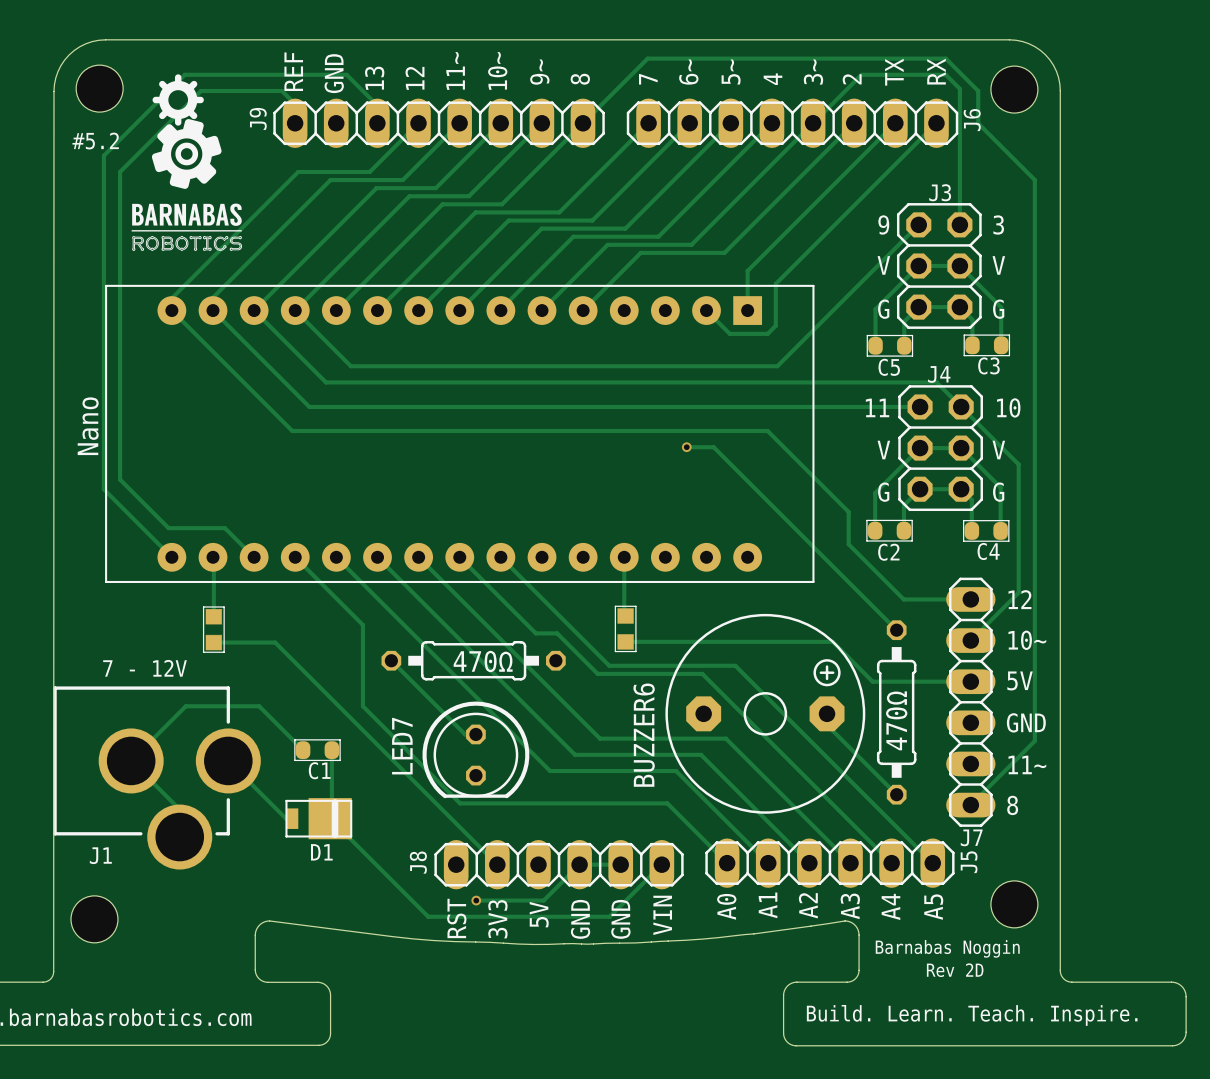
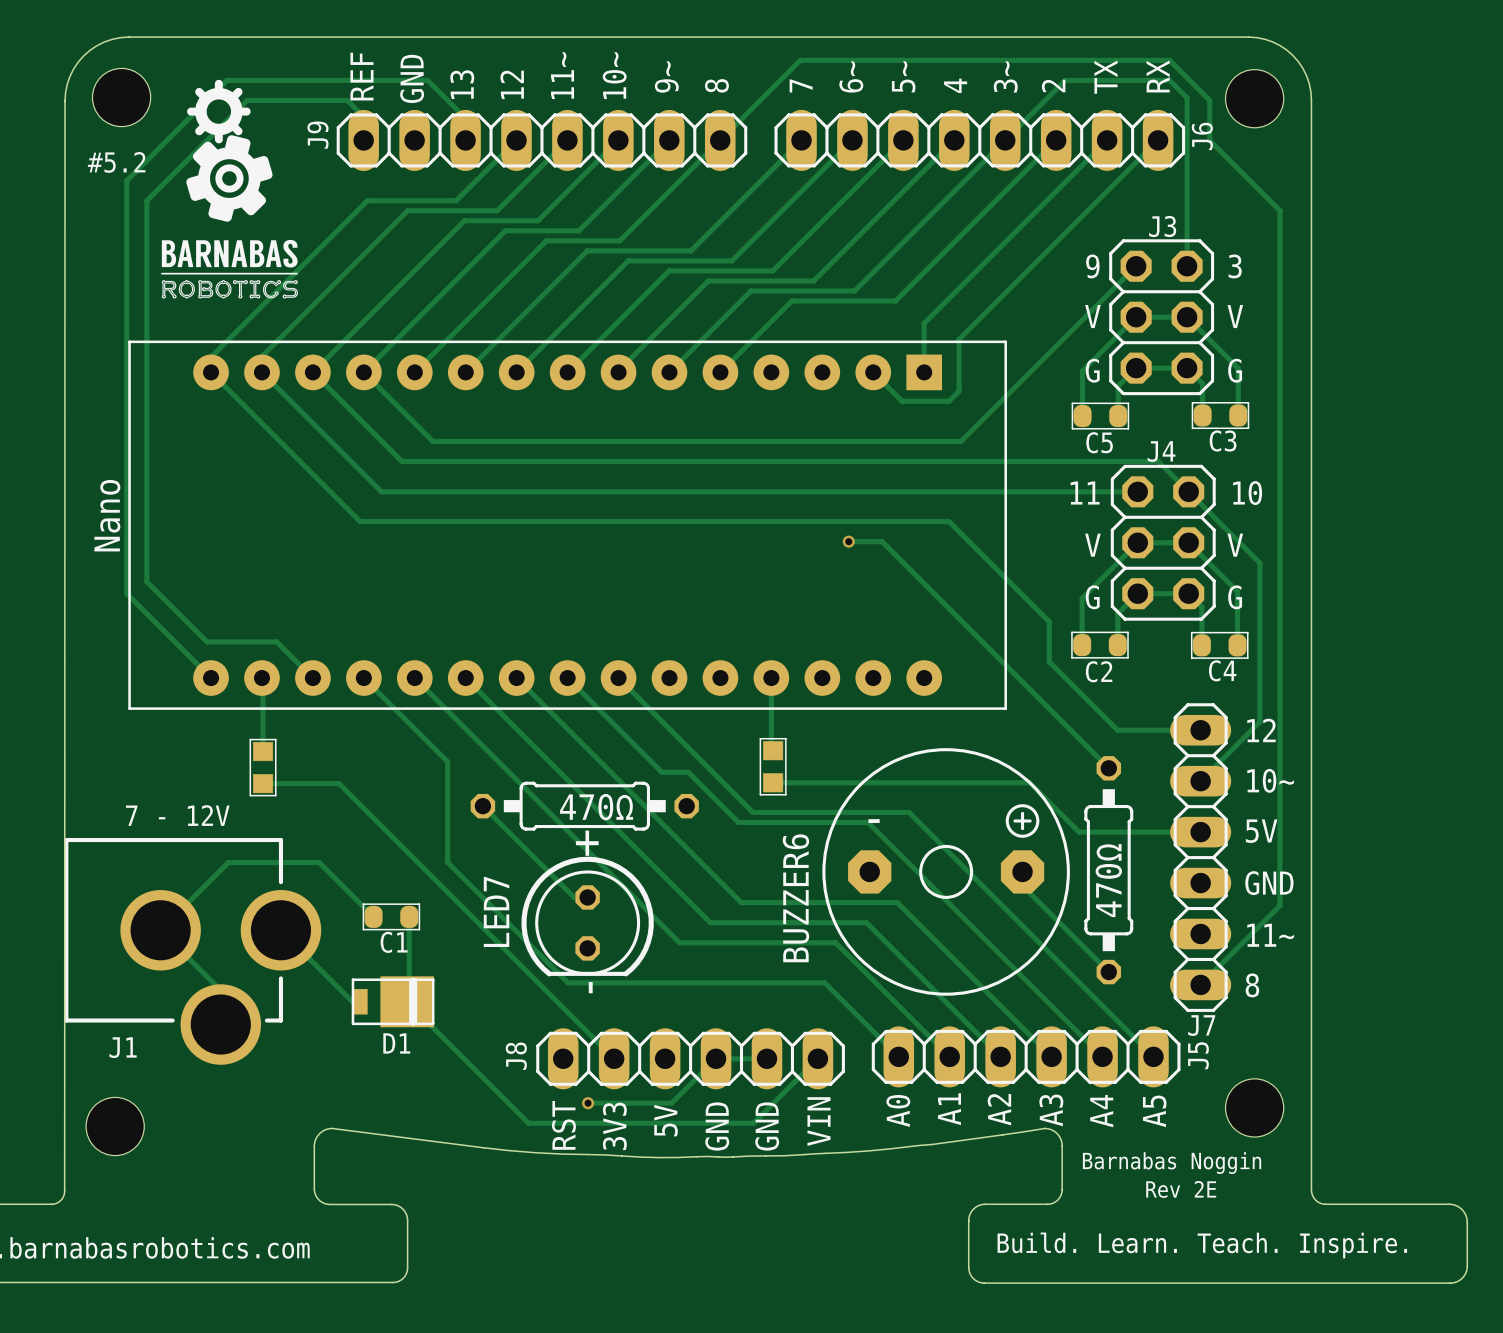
text: none -> - (874, 821)
text: none -> + (587, 843)
text: none -> - (590, 987)
text: Rev 2D (955, 970) -> Rev 2E (1181, 1189)

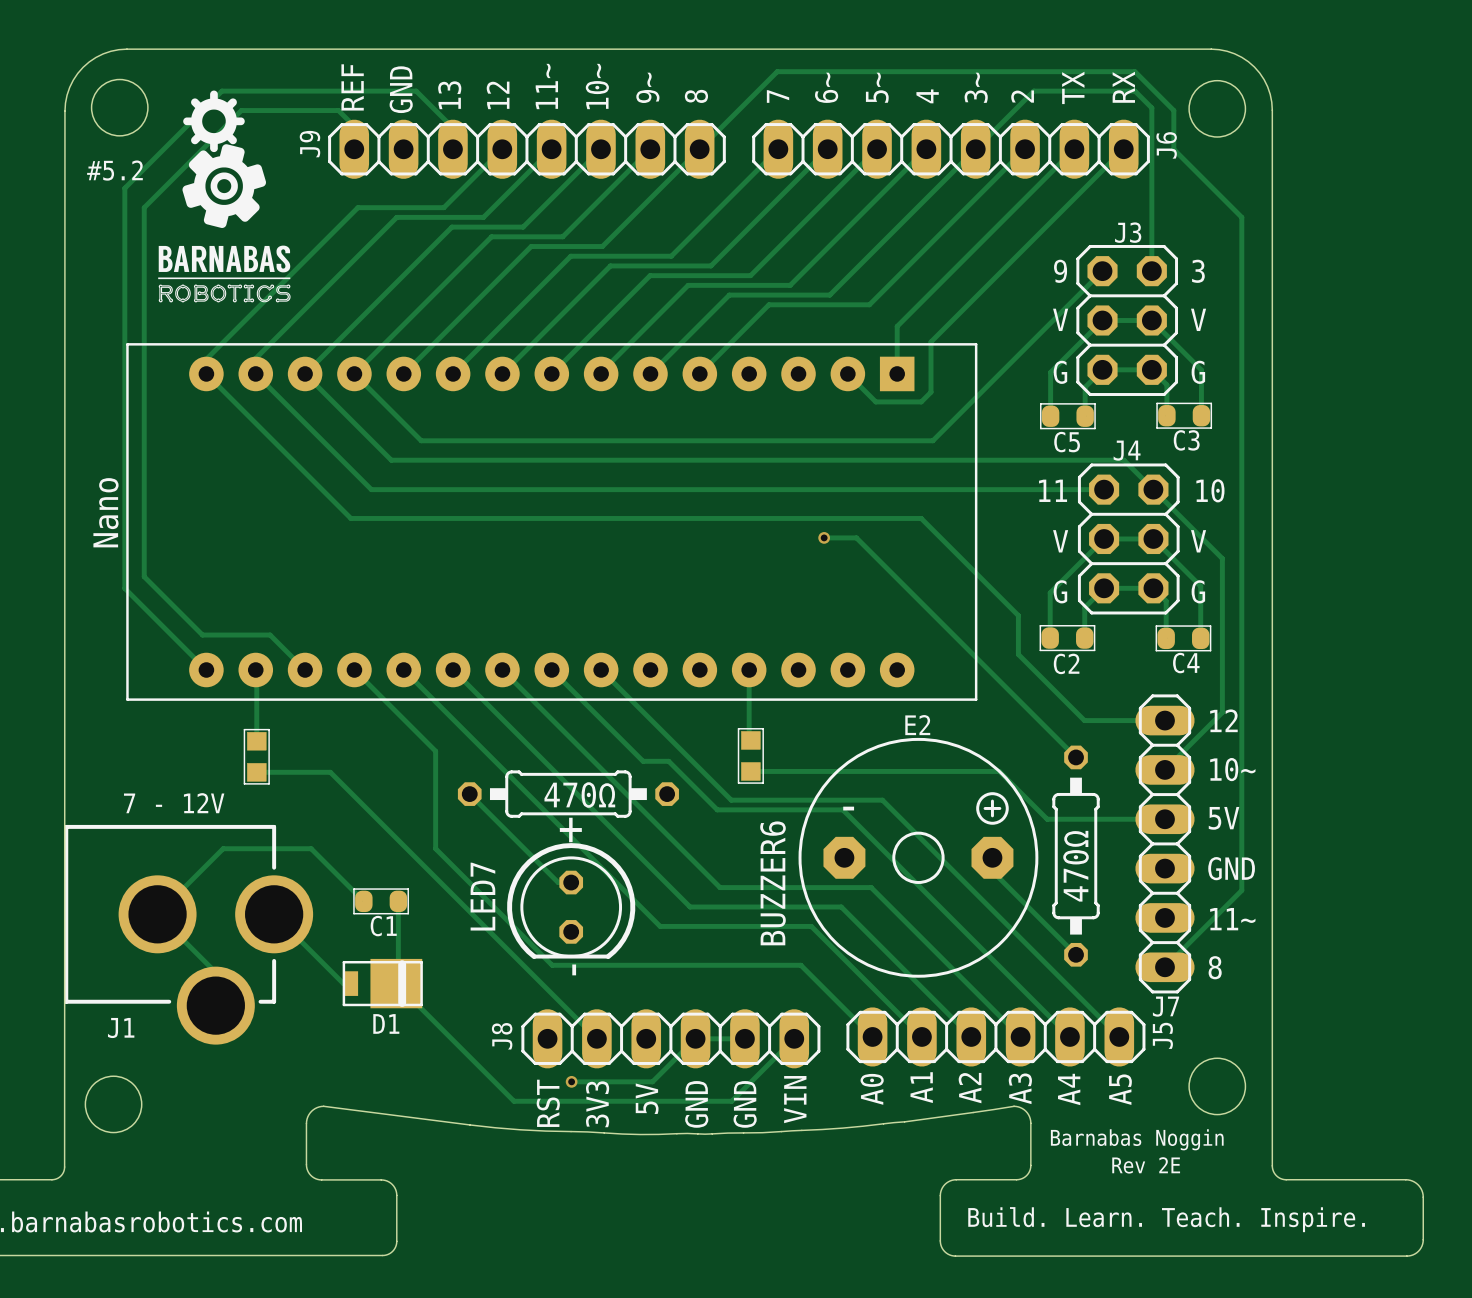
round board edge: none -> [90, 78, 149, 137]
round board edge: none -> [1188, 79, 1247, 138]
hole: (121, 97) -> none
hole: (1254, 98) -> none
E2 name: none -> E2 (917, 725)
round board edge: none -> [1188, 1057, 1247, 1116]
round board edge: none -> [84, 1075, 143, 1134]
hole: (1254, 1107) -> none
hole: (115, 1126) -> none

